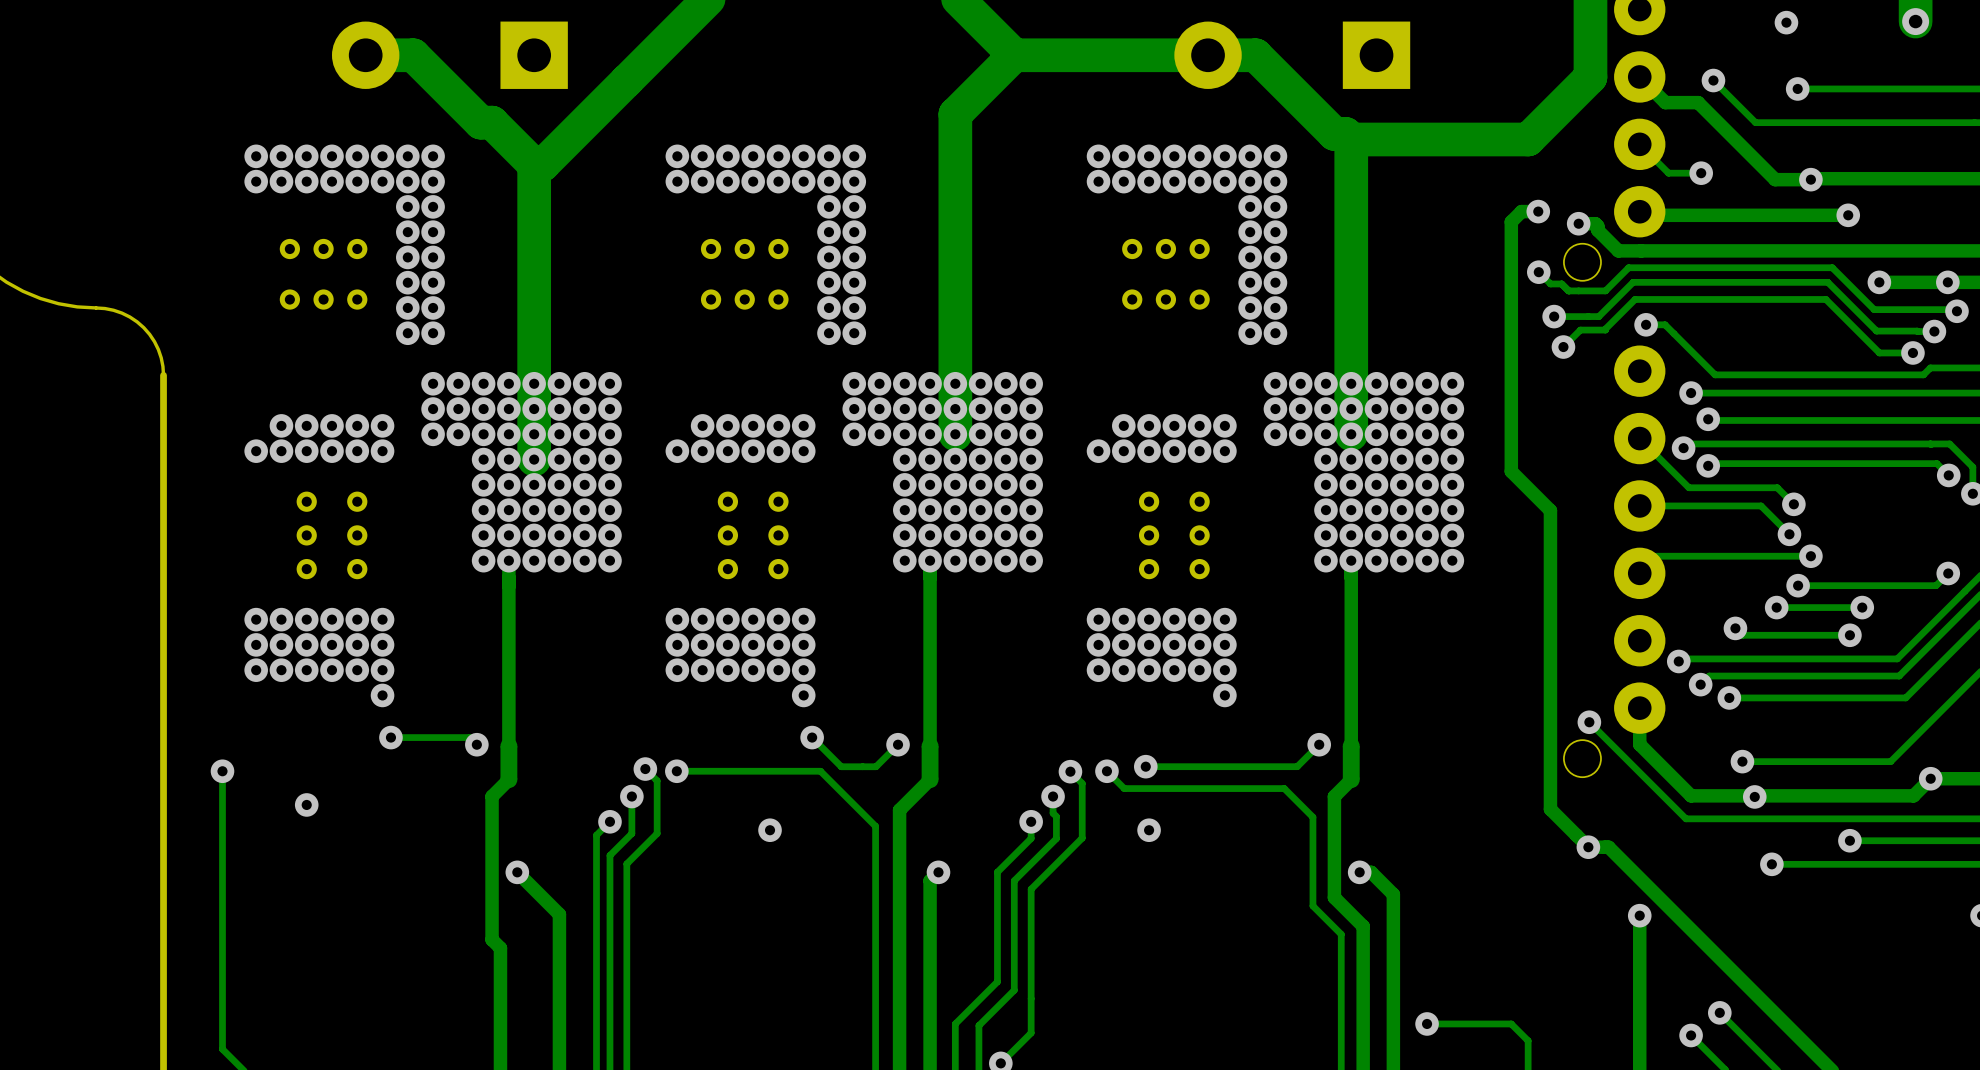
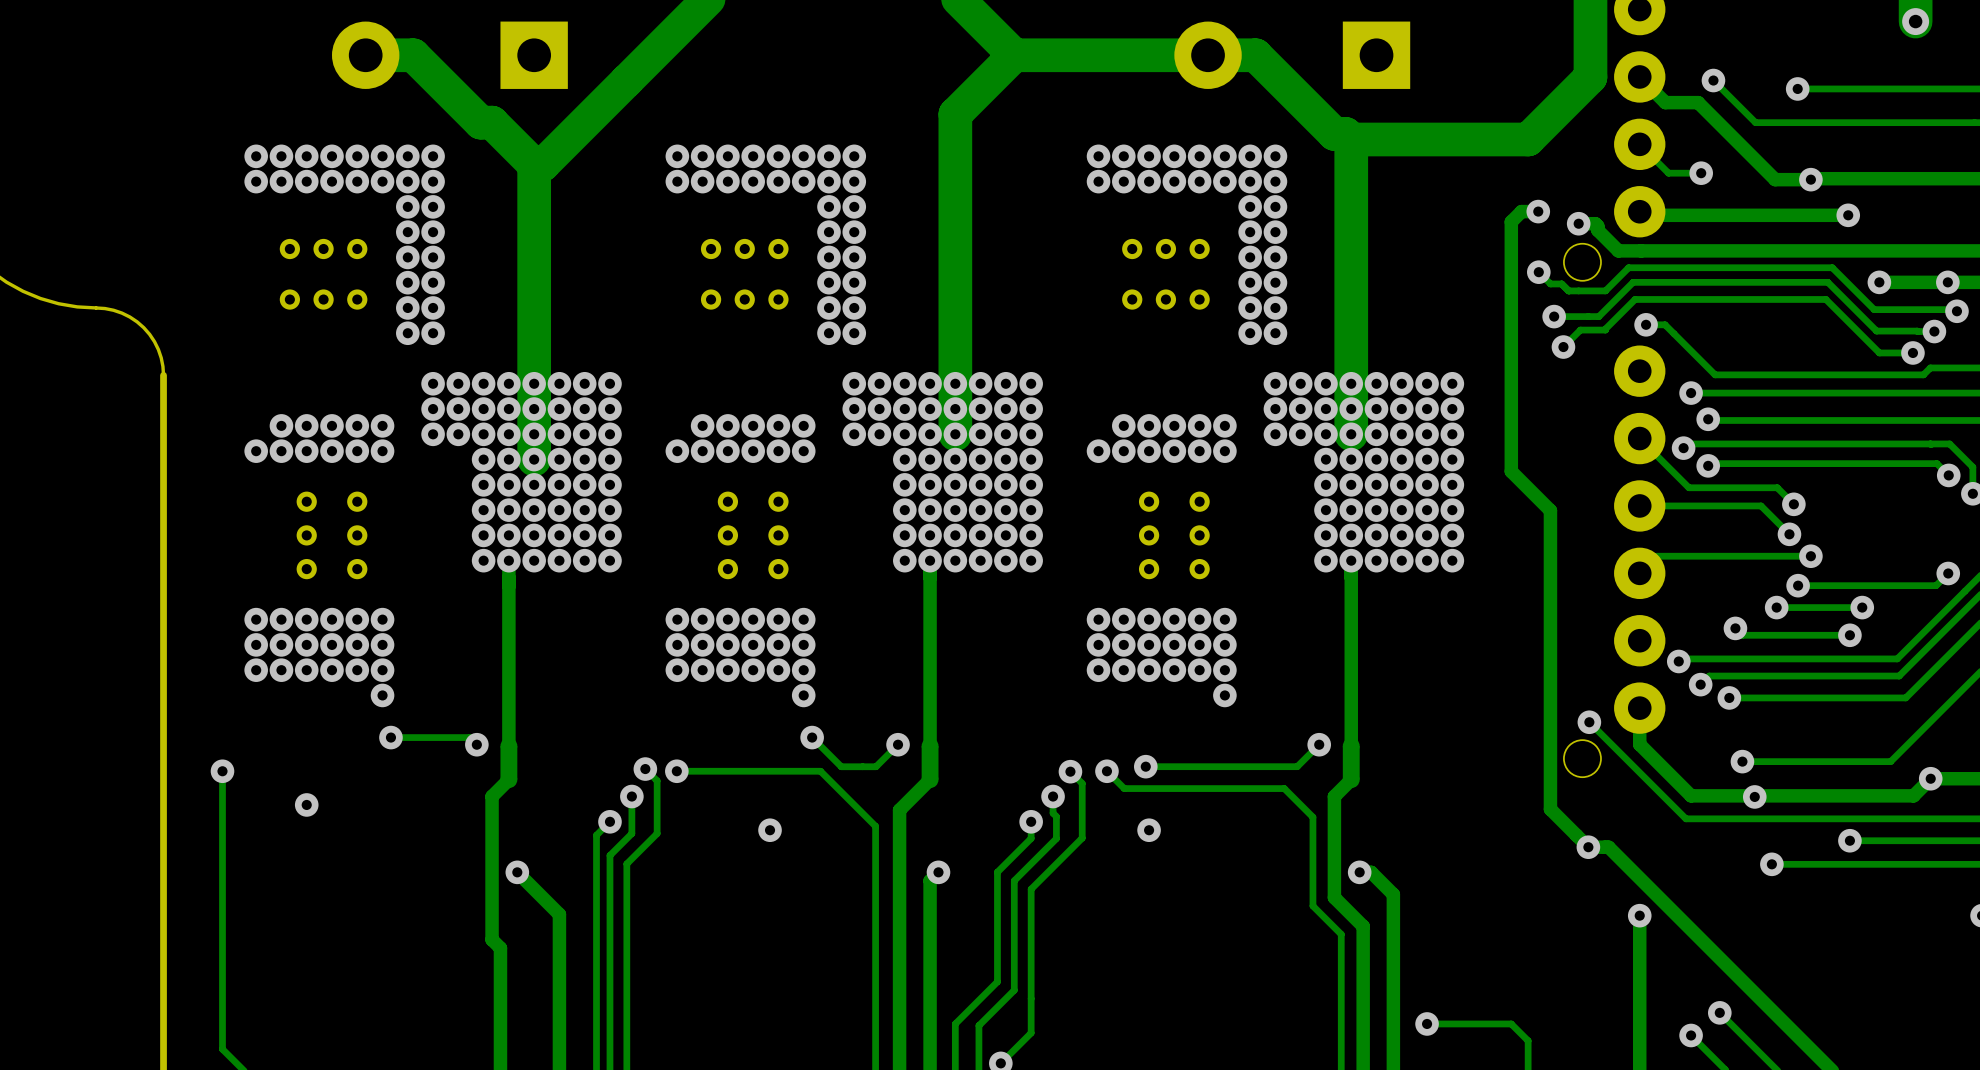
via: (1786, 22) -> none

